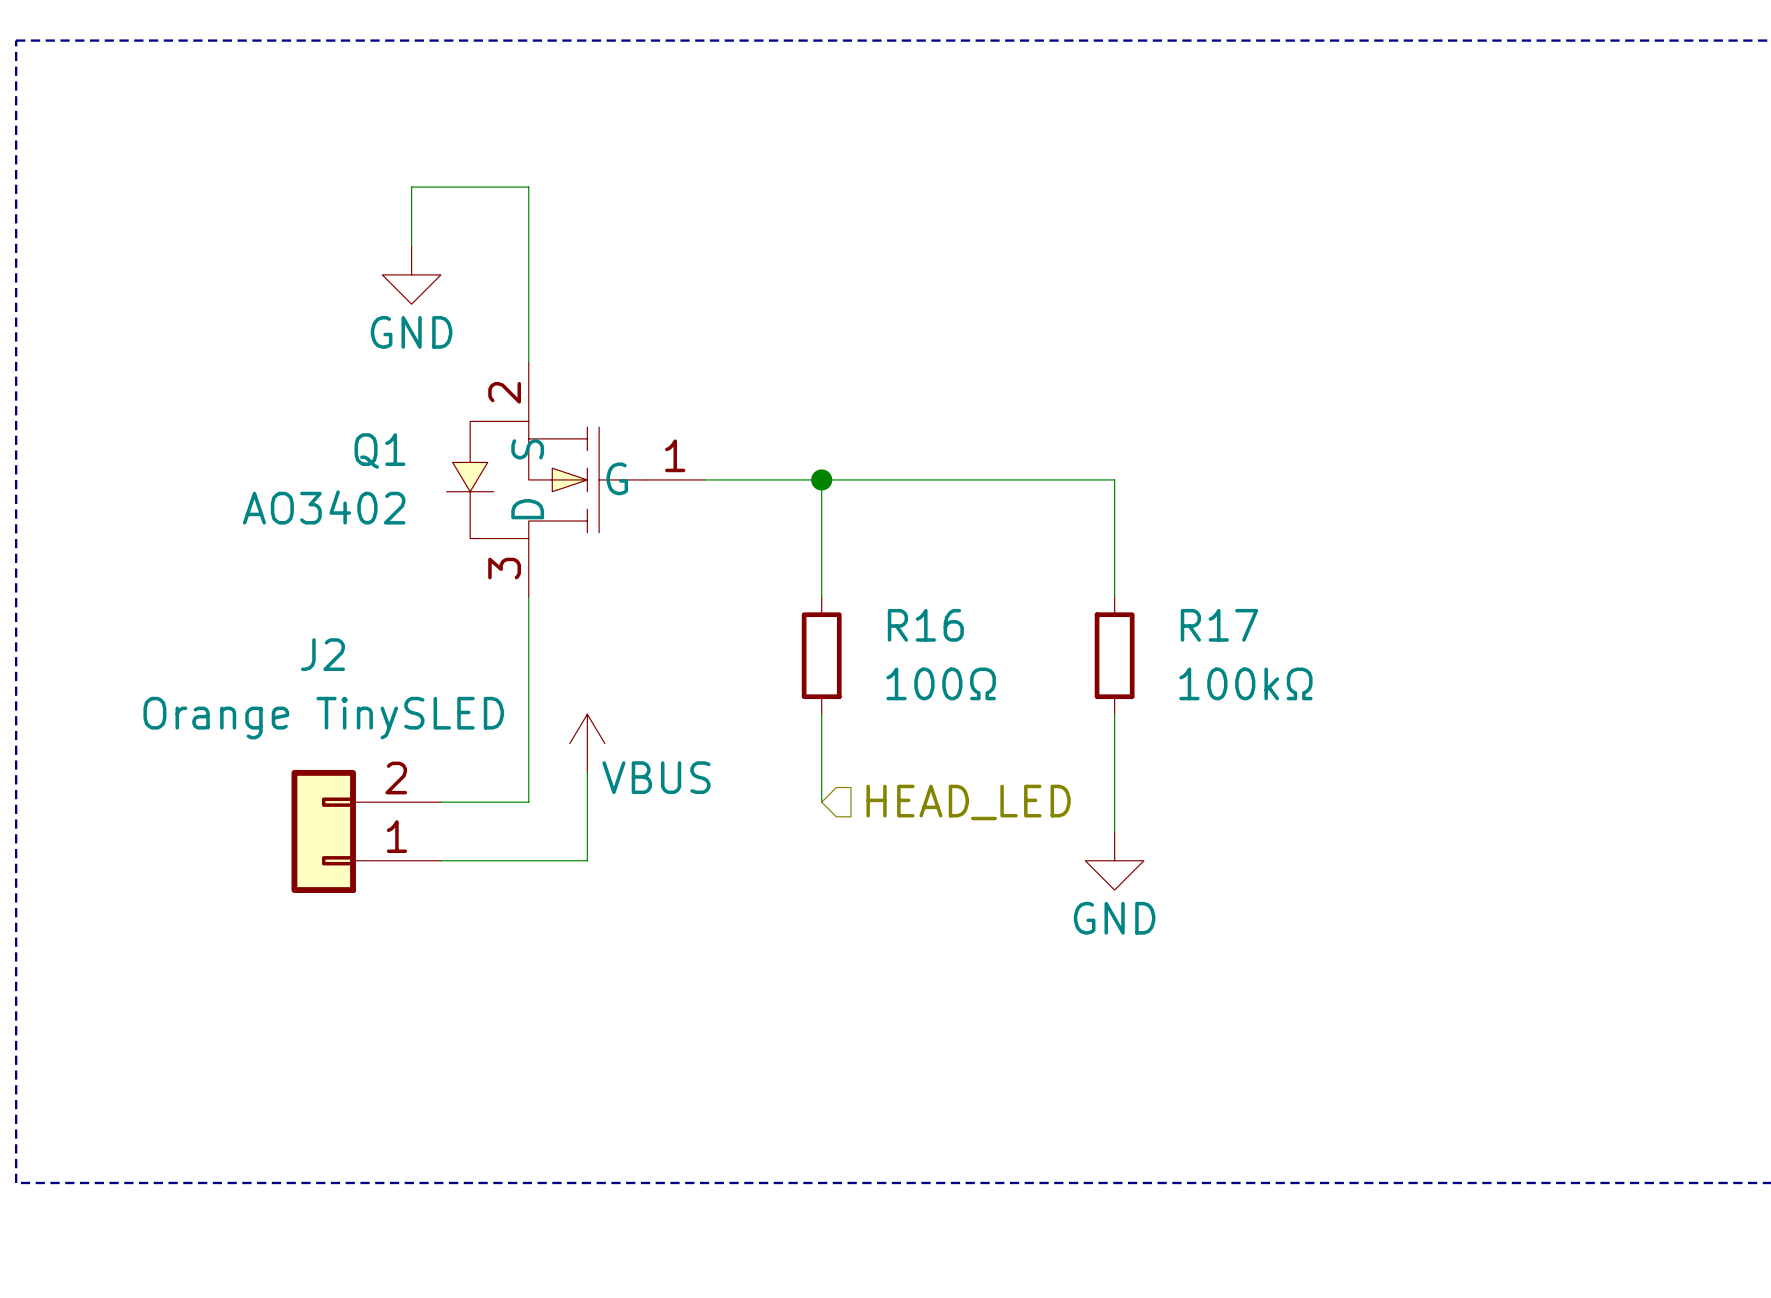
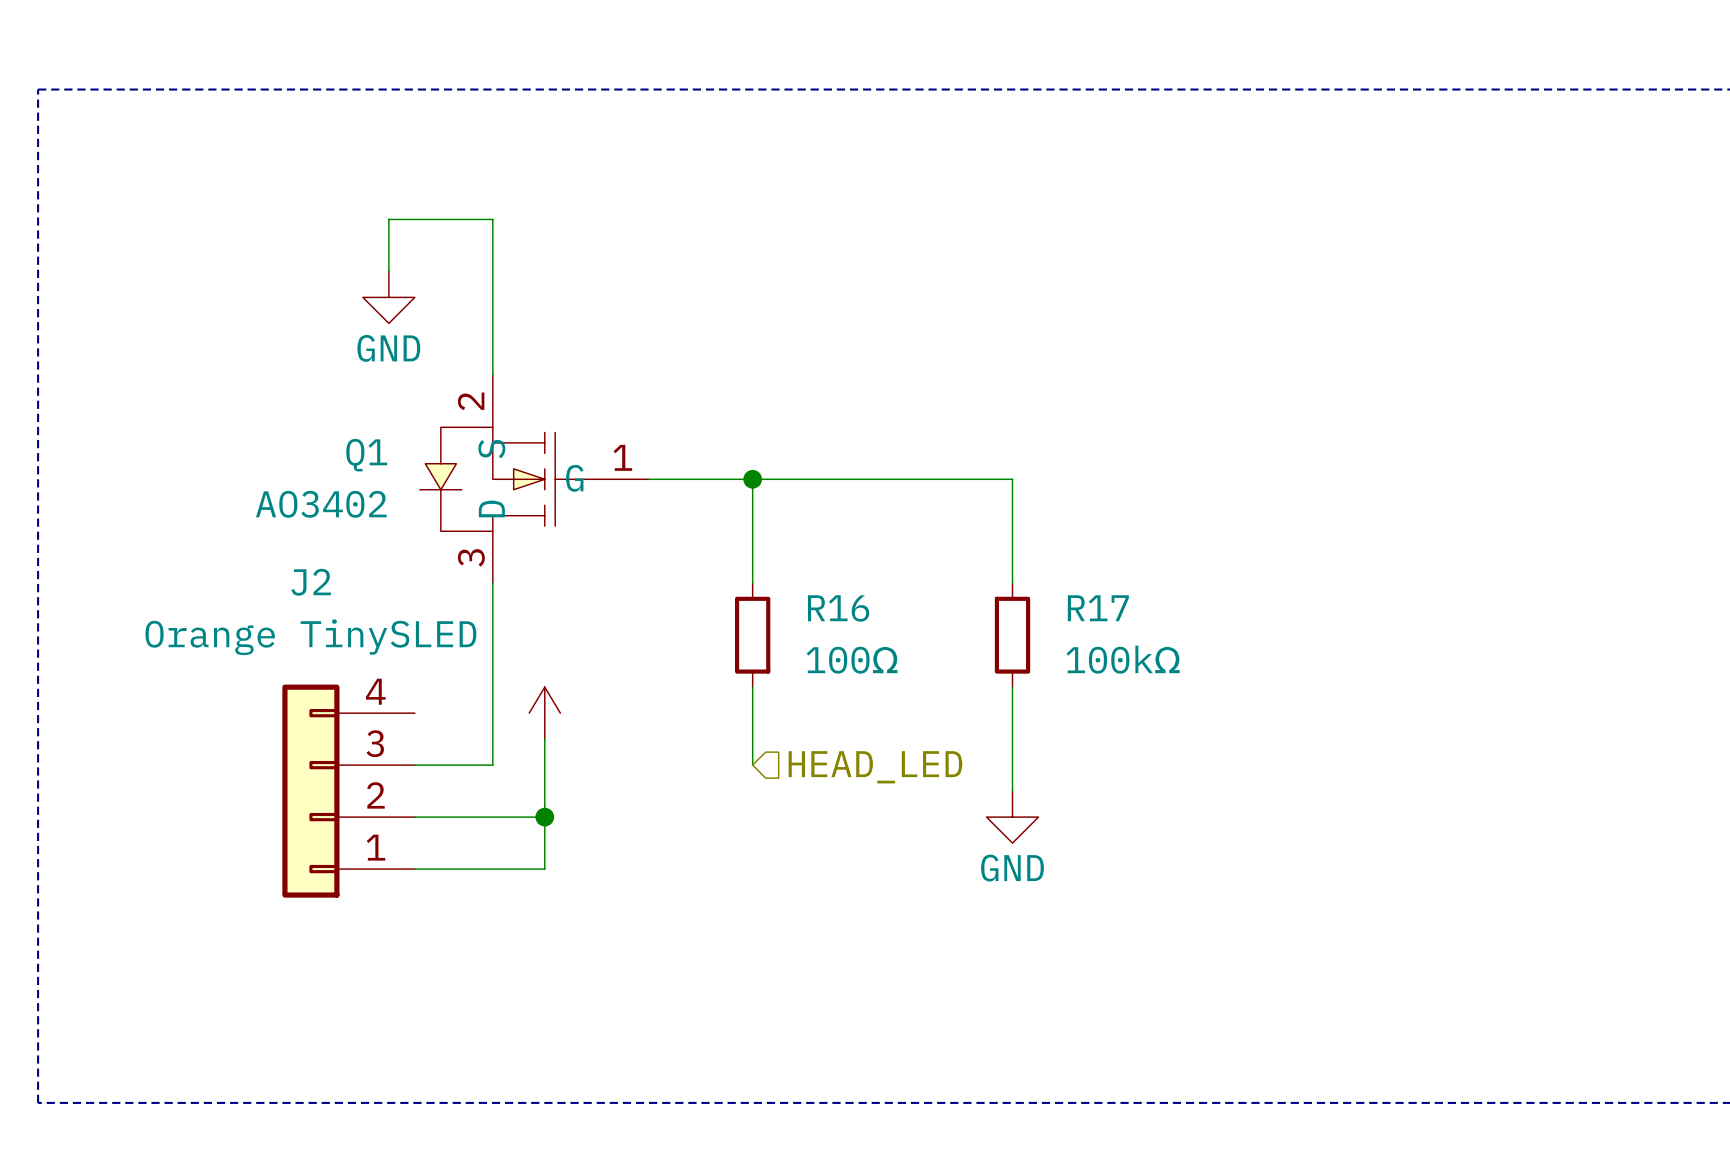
J2 name position: J2 (323, 654) -> J2 (311, 582)
J2 value position: Orange TinySLED (323, 718) -> Orange TinySLED (310, 637)
J2 symbol: [291, 769, 441, 893] -> [282, 684, 415, 898]
power symbol text: VBUS (656, 777) -> none
wire: none -> (544, 817) (544, 869) (414, 869)
junction: none -> (544, 817)

